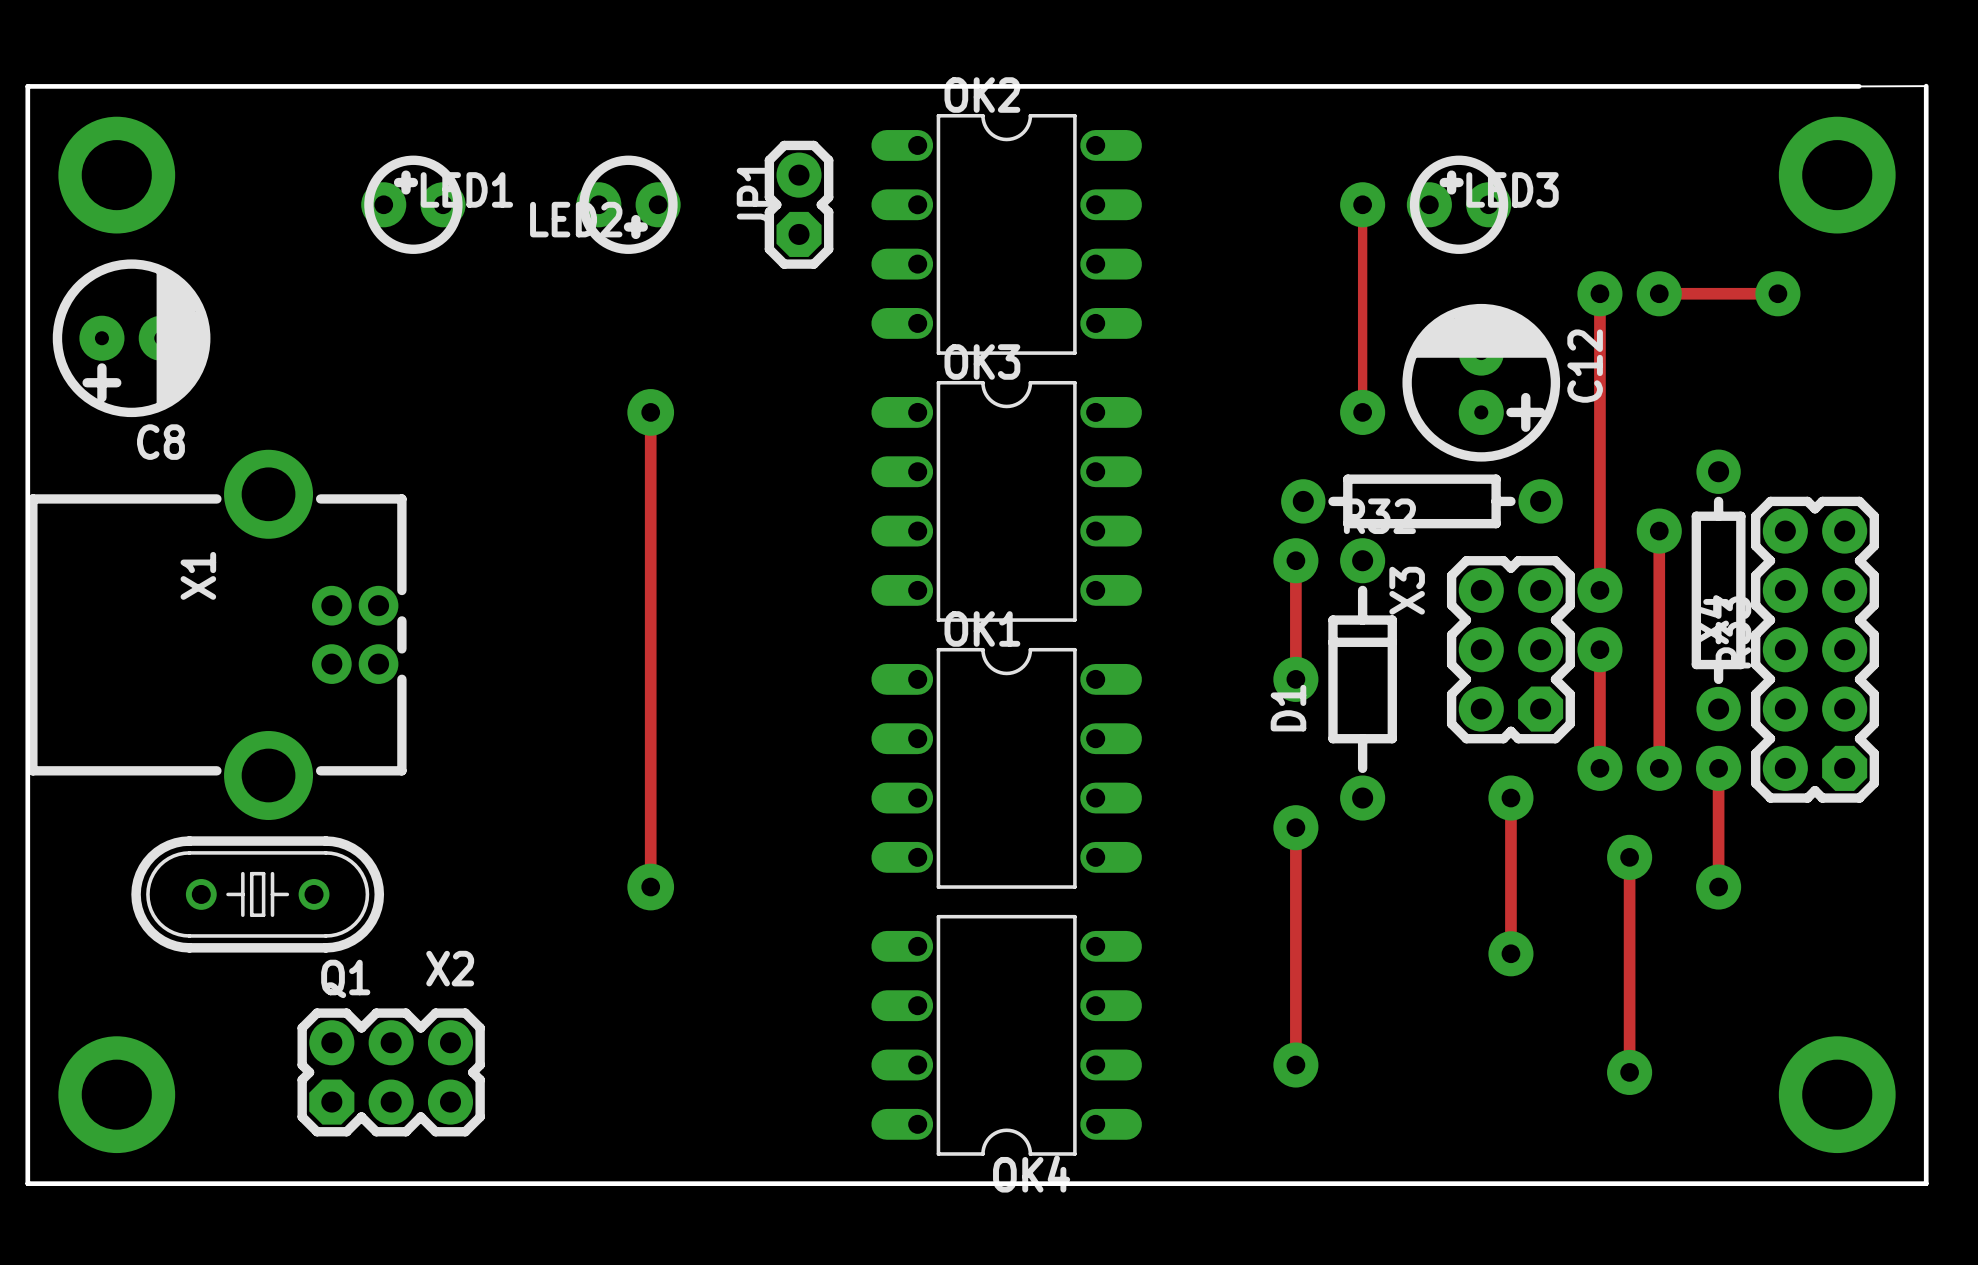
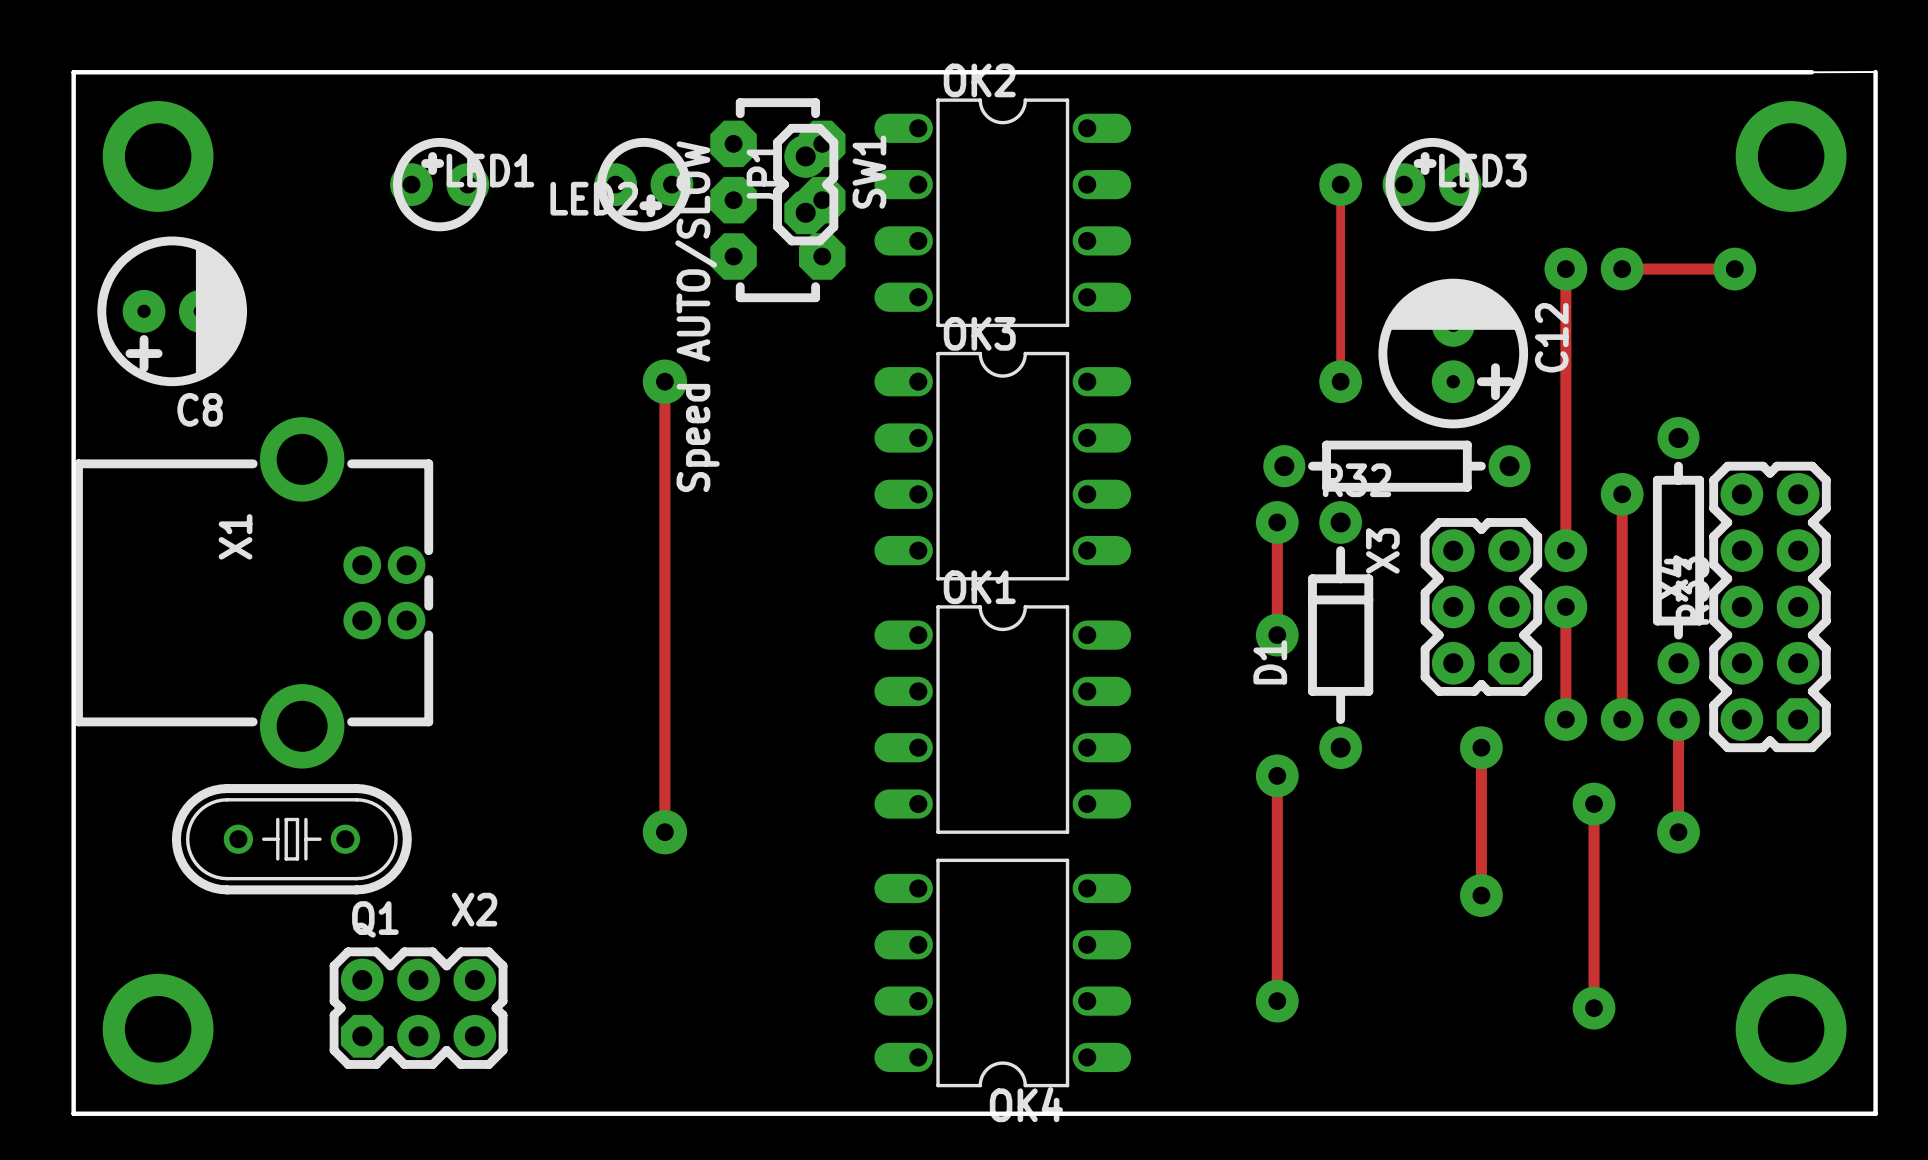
SW1: none -> Speed AUTO/SLOW (777, 200)

